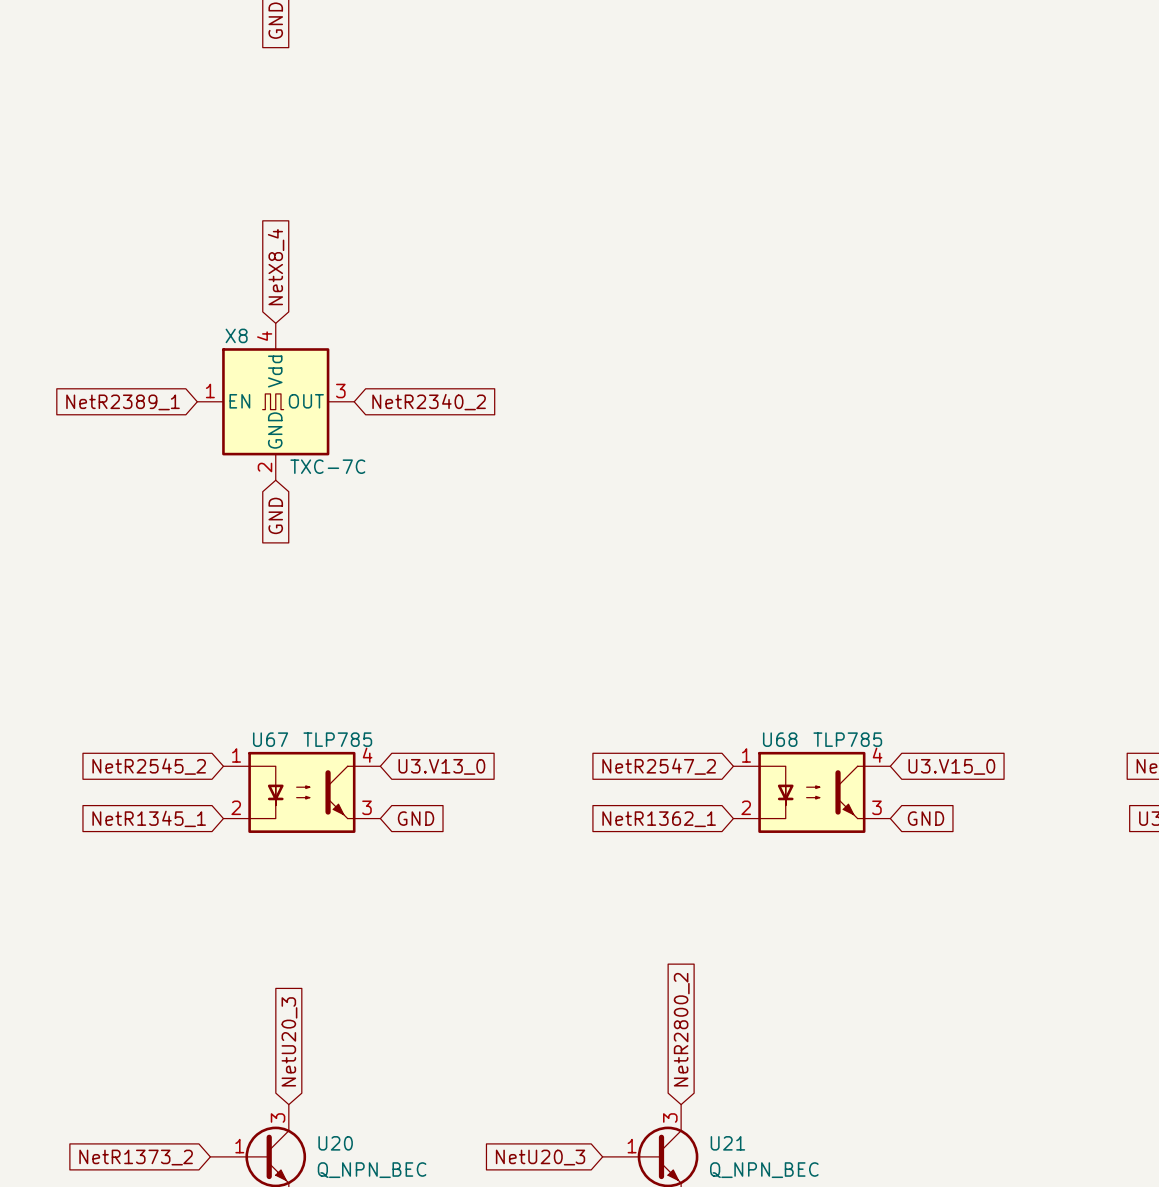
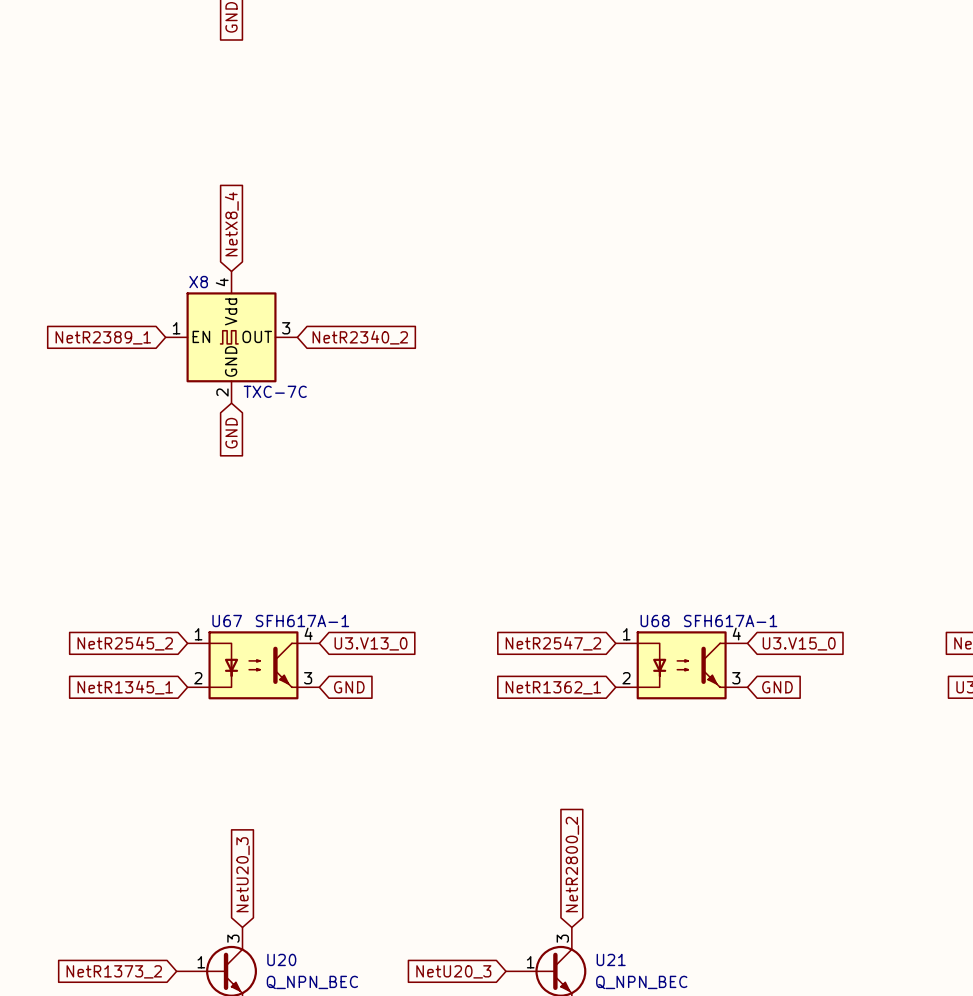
U67 value: TLP785 (337, 739) -> SFH617A-1 (302, 620)
U68 value: TLP785 (847, 739) -> SFH617A-1 (730, 620)

